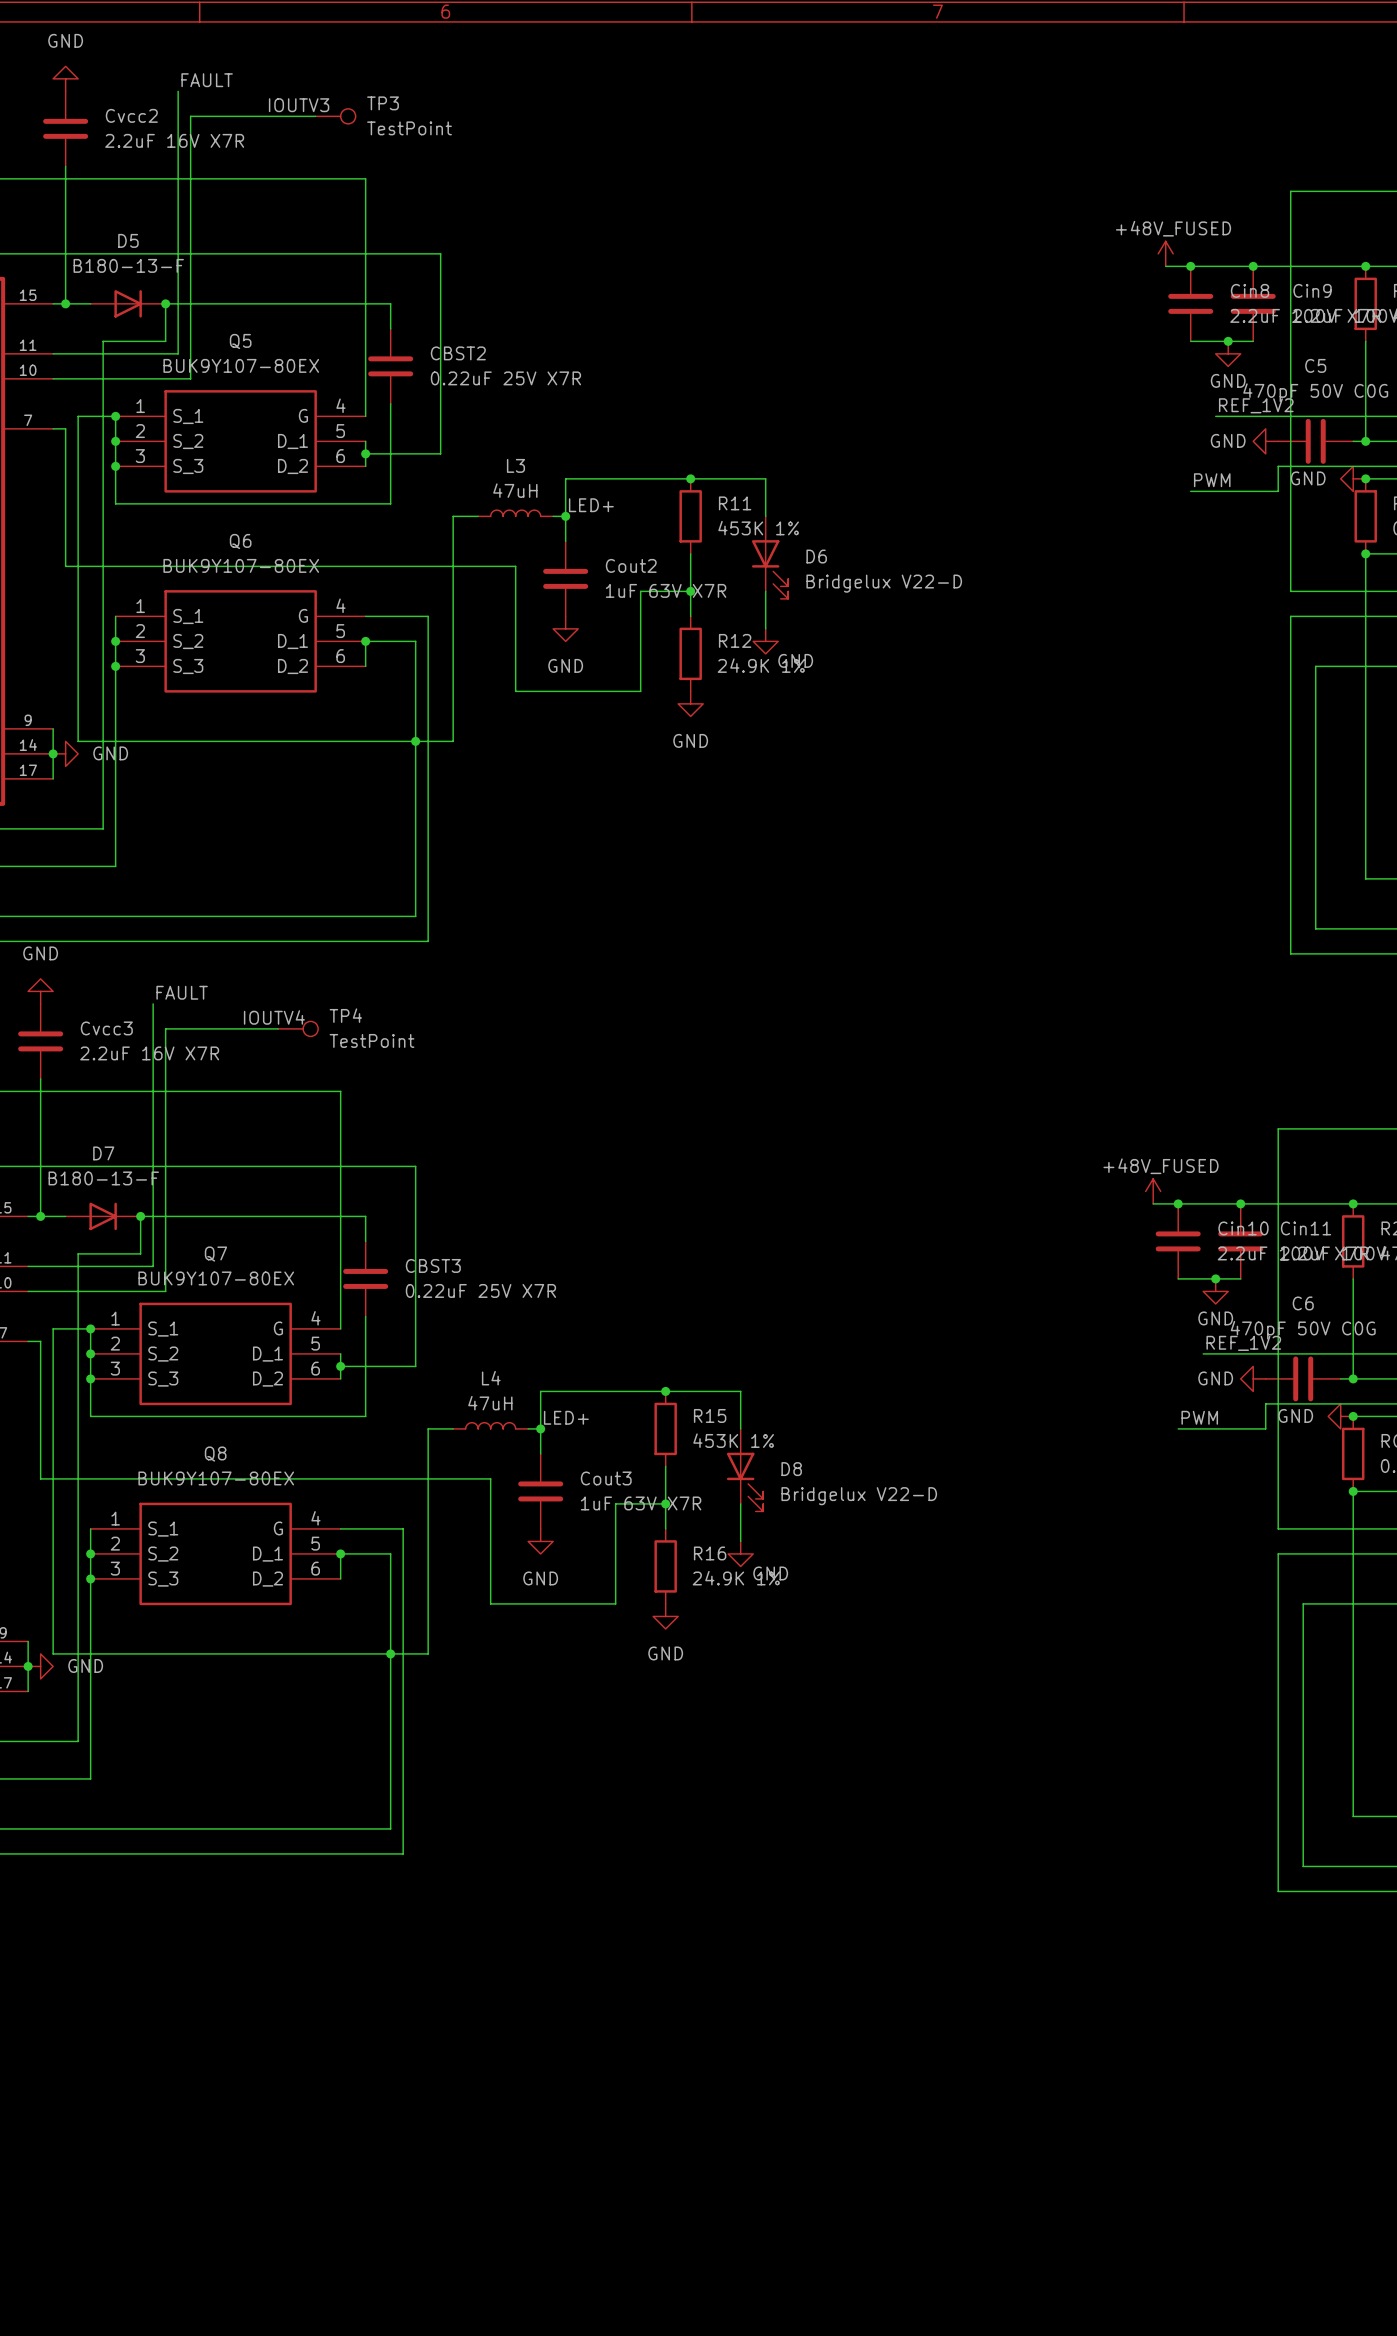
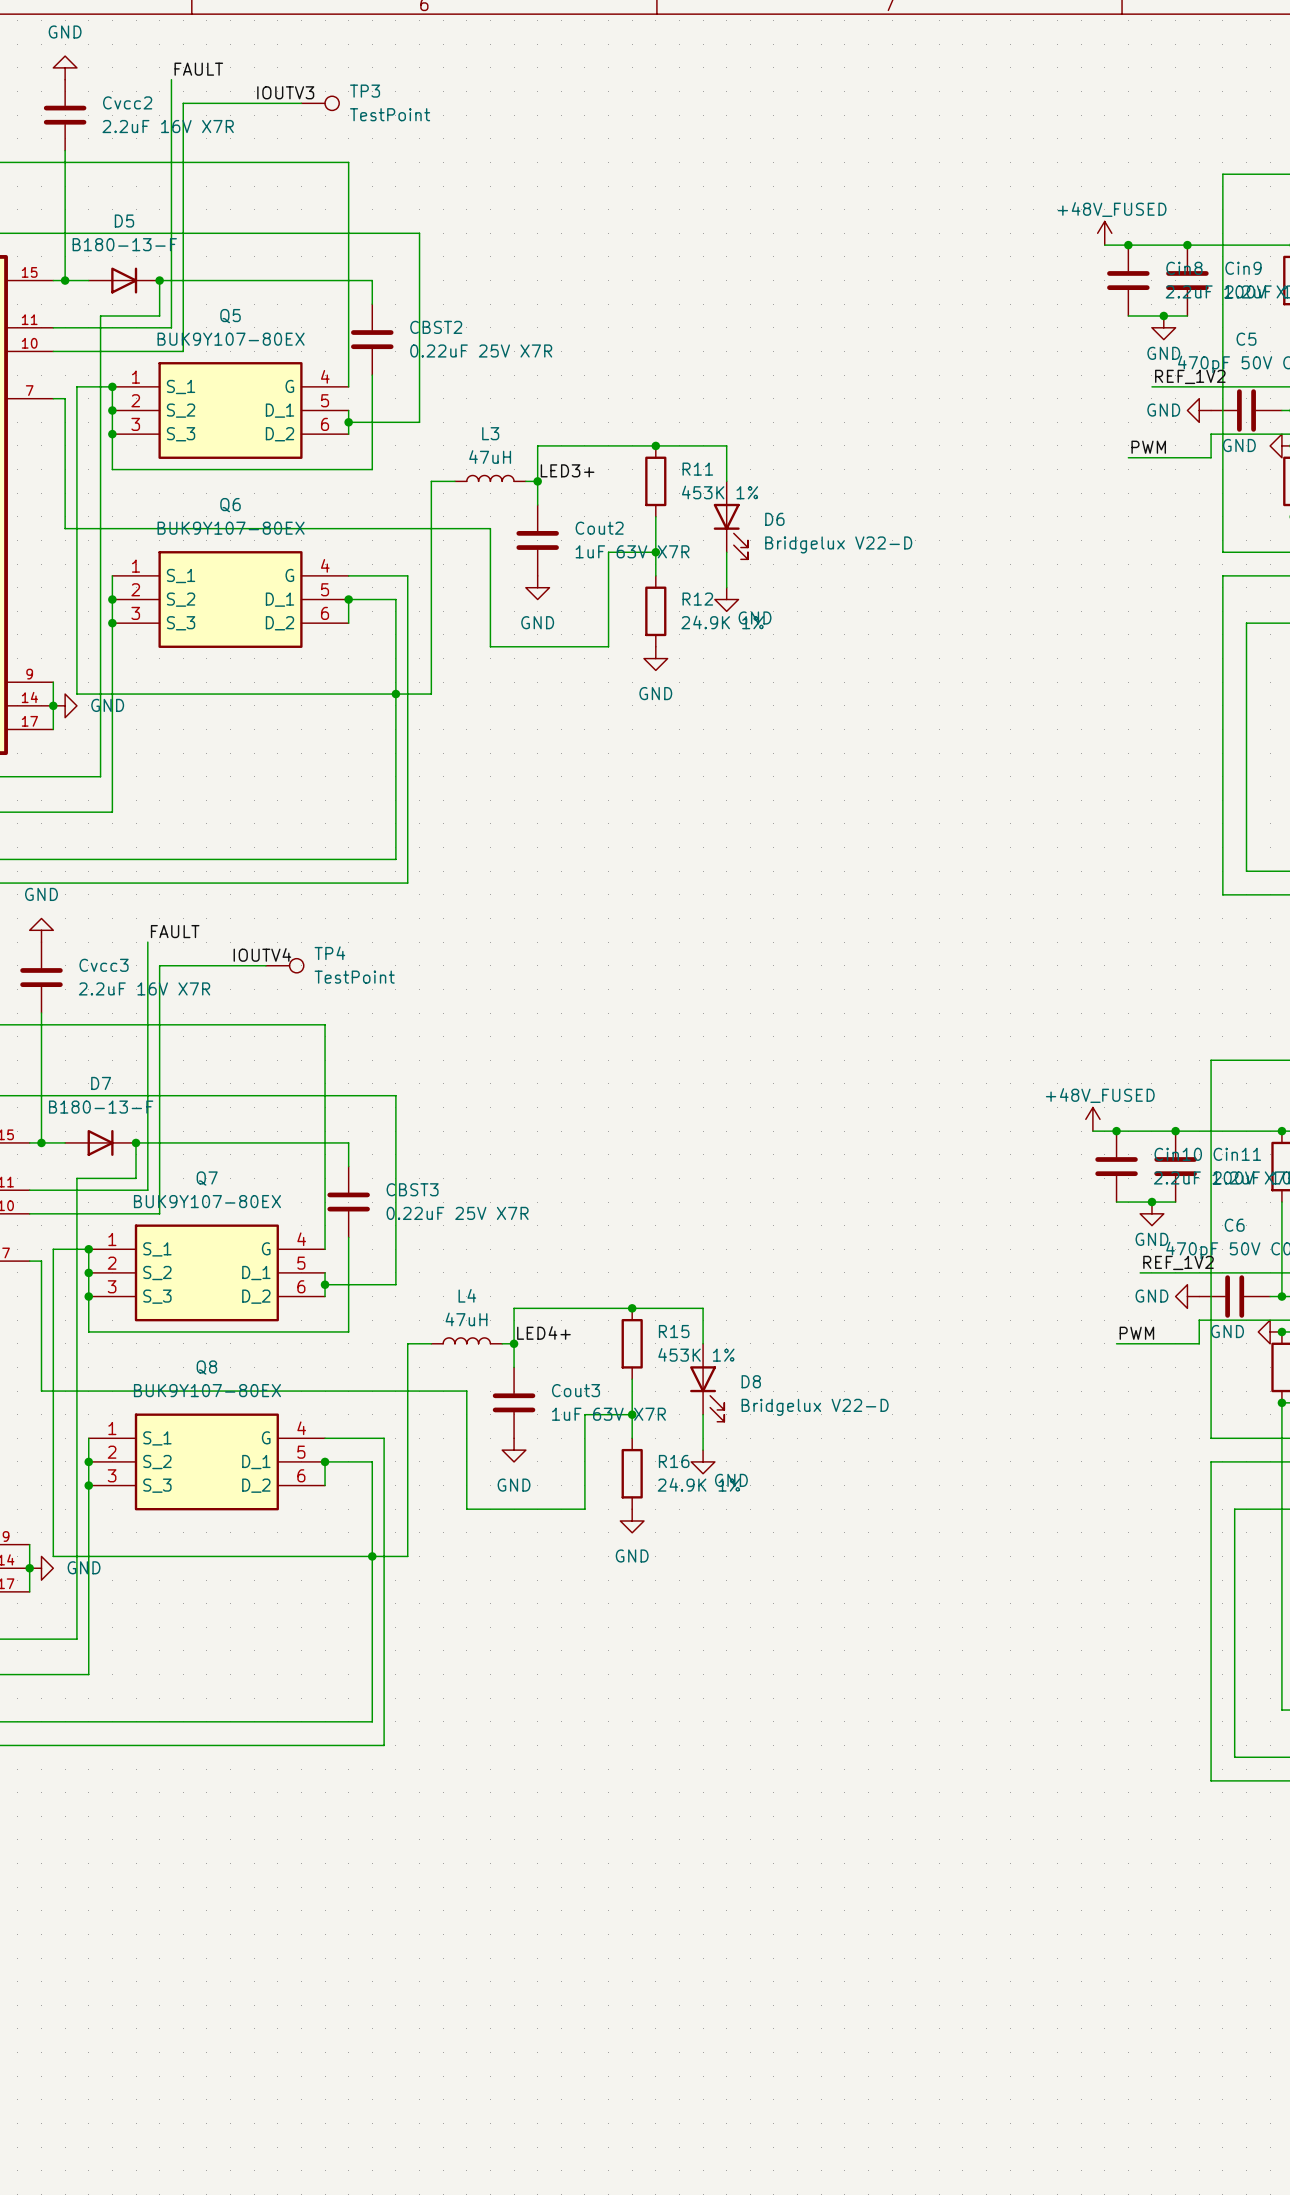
label: LED+ (591, 505) -> LED3+ (567, 470)
label: LED+ (566, 1417) -> LED4+ (543, 1332)

